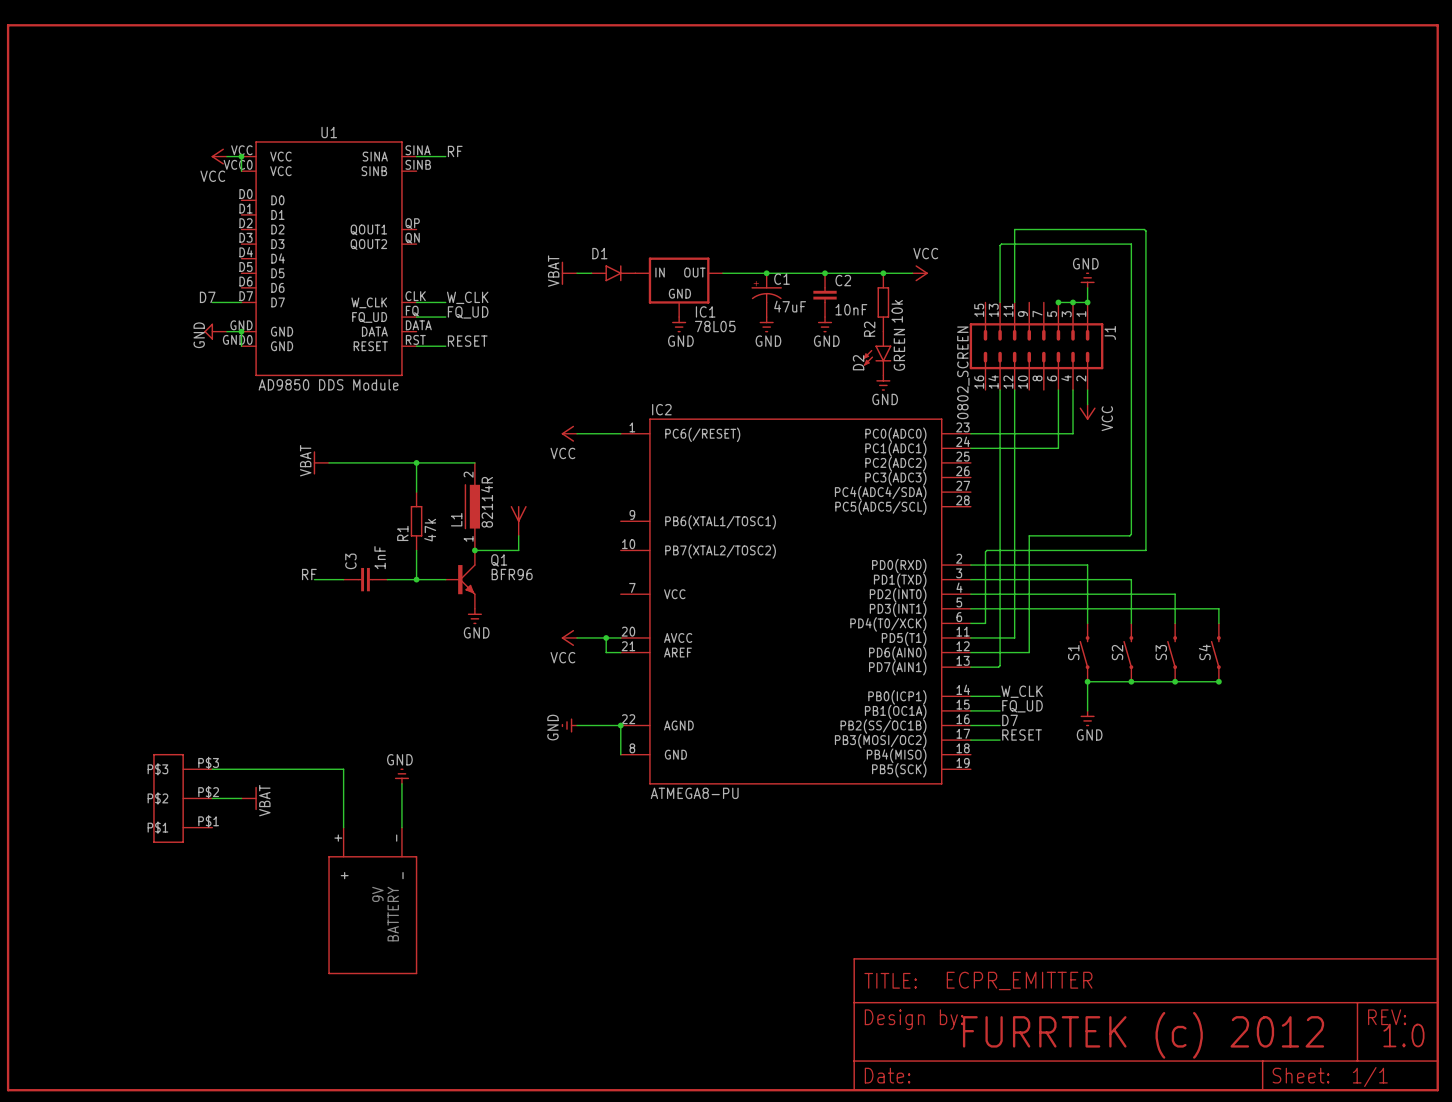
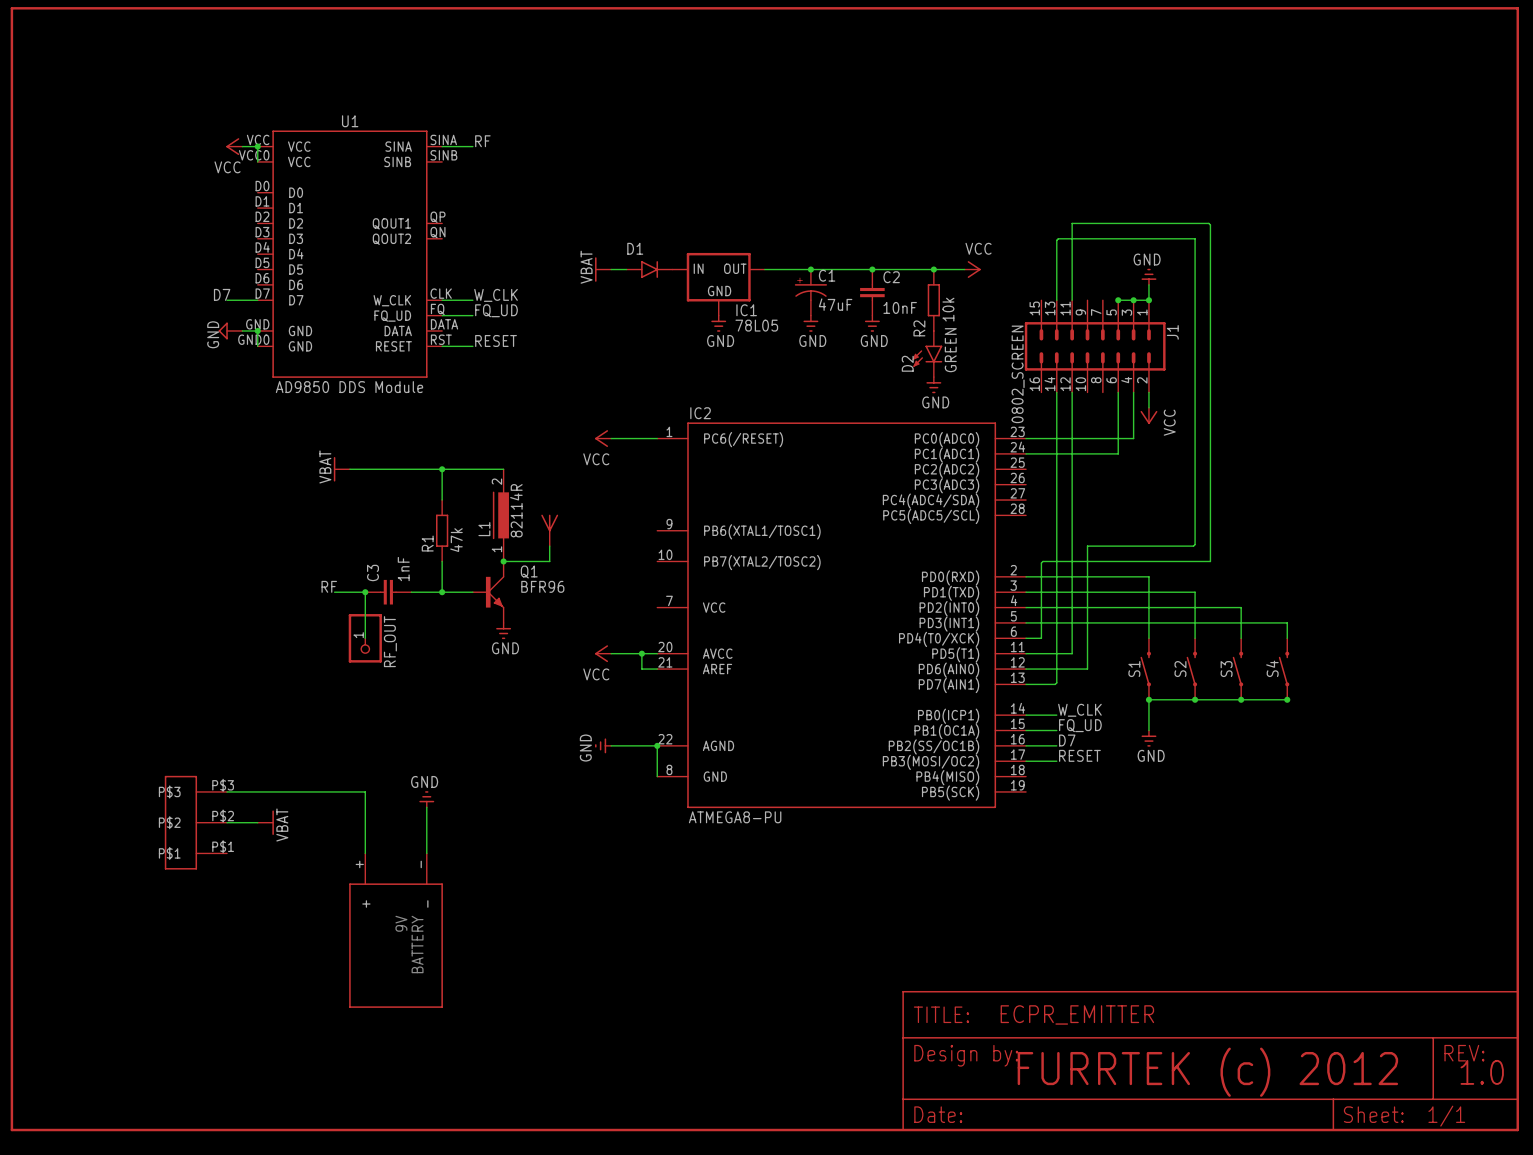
wire: none -> (365, 592) (365, 638)
junction: none -> (365, 592)
RF_OUT: none -> (365, 638)

